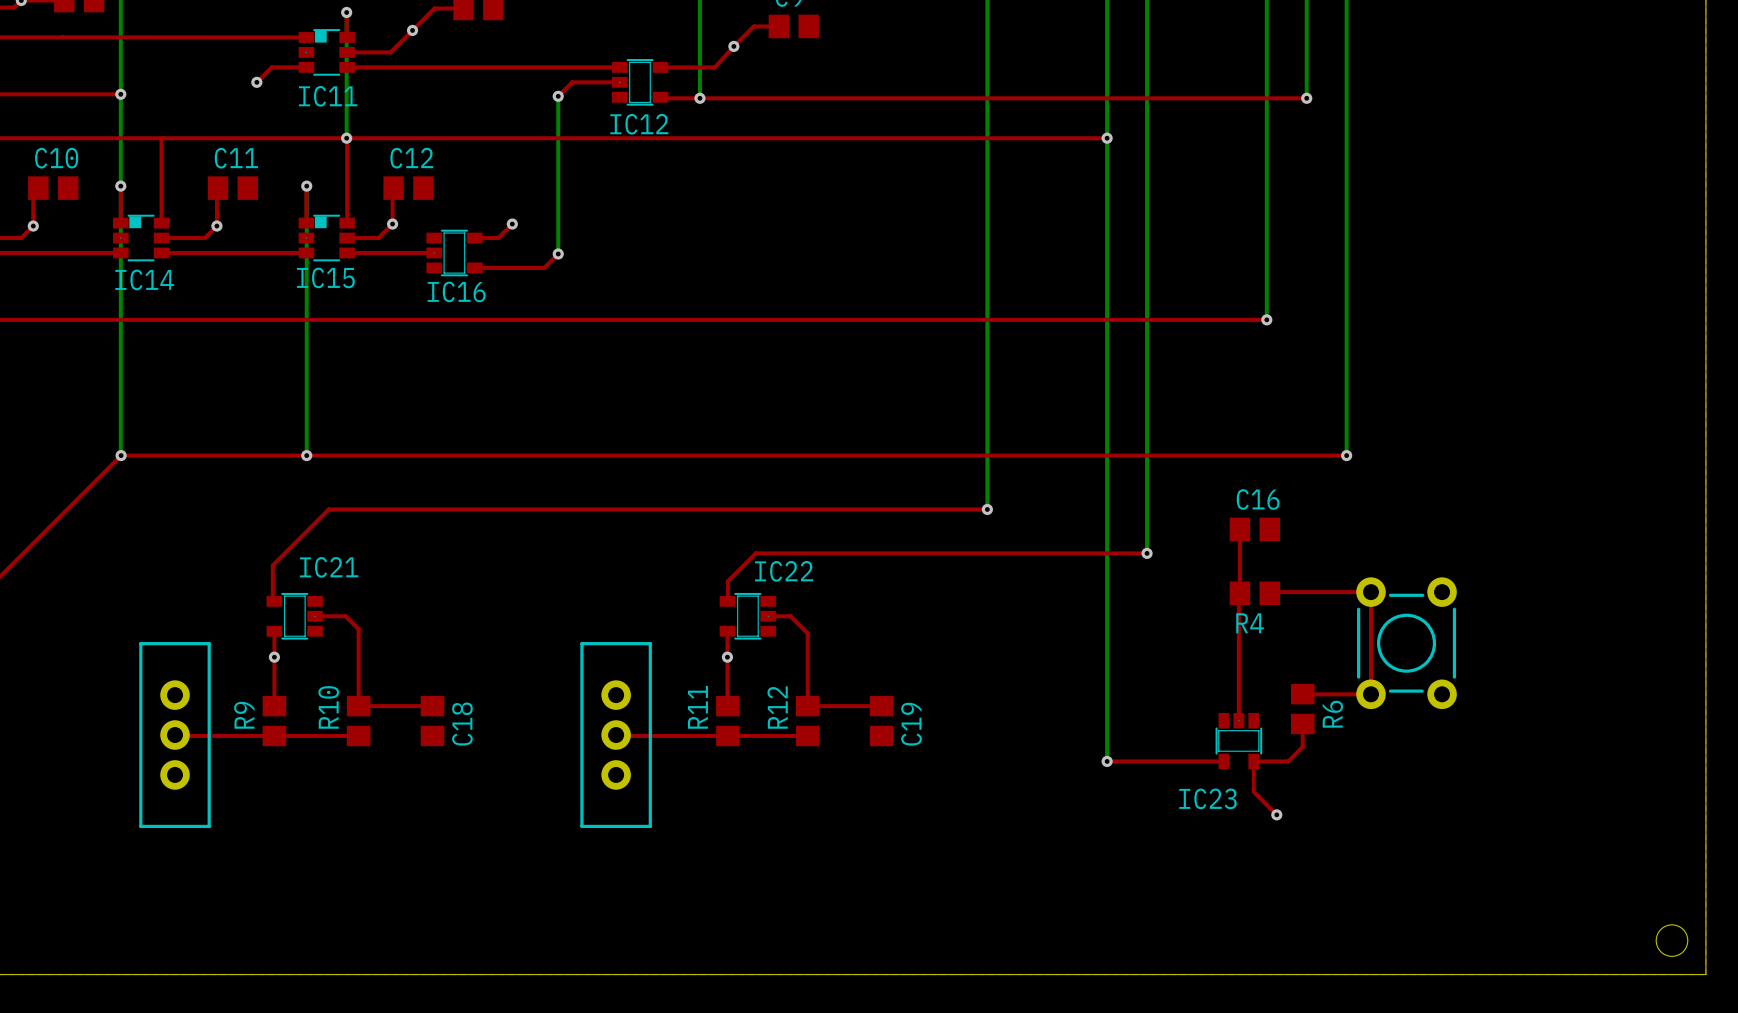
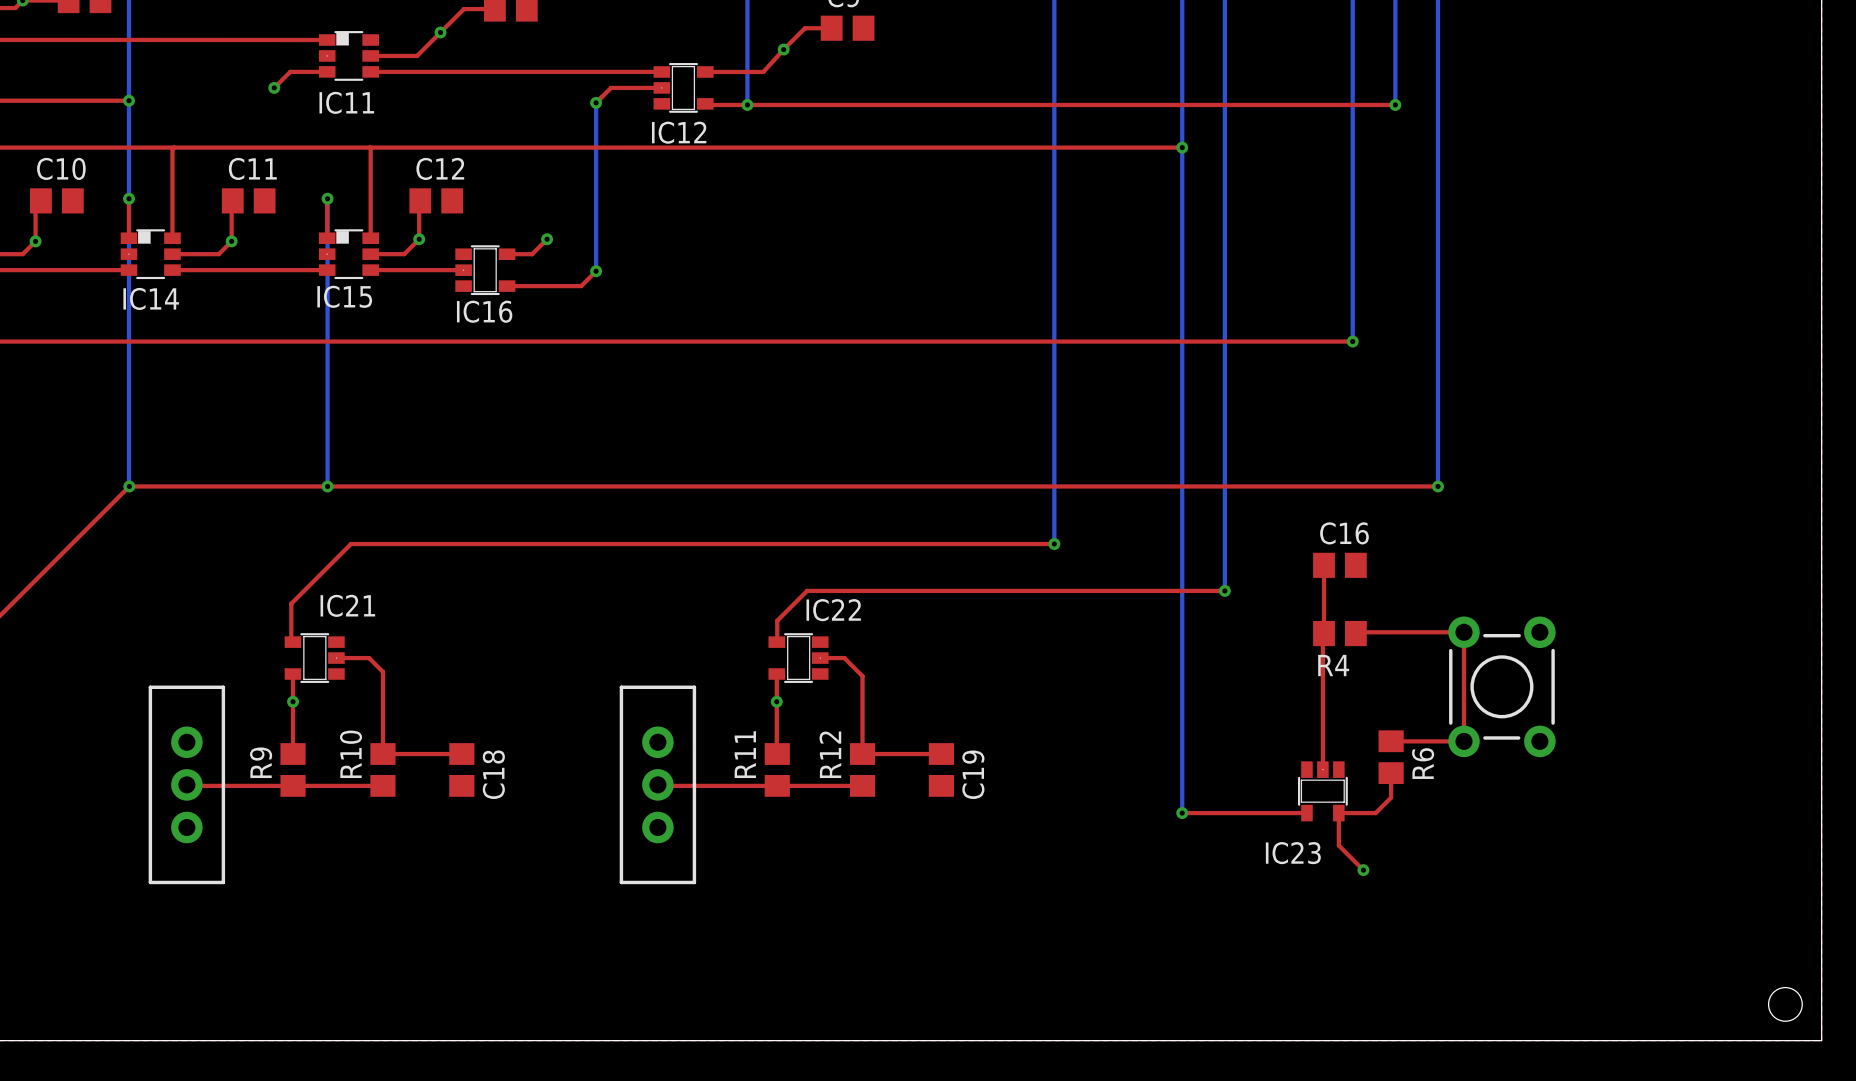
top track: (346, 12) (347, 37) -> none
bottom track: (346, 12) (346, 138) -> none
via: (346, 12) -> none
via: (346, 138) -> none

